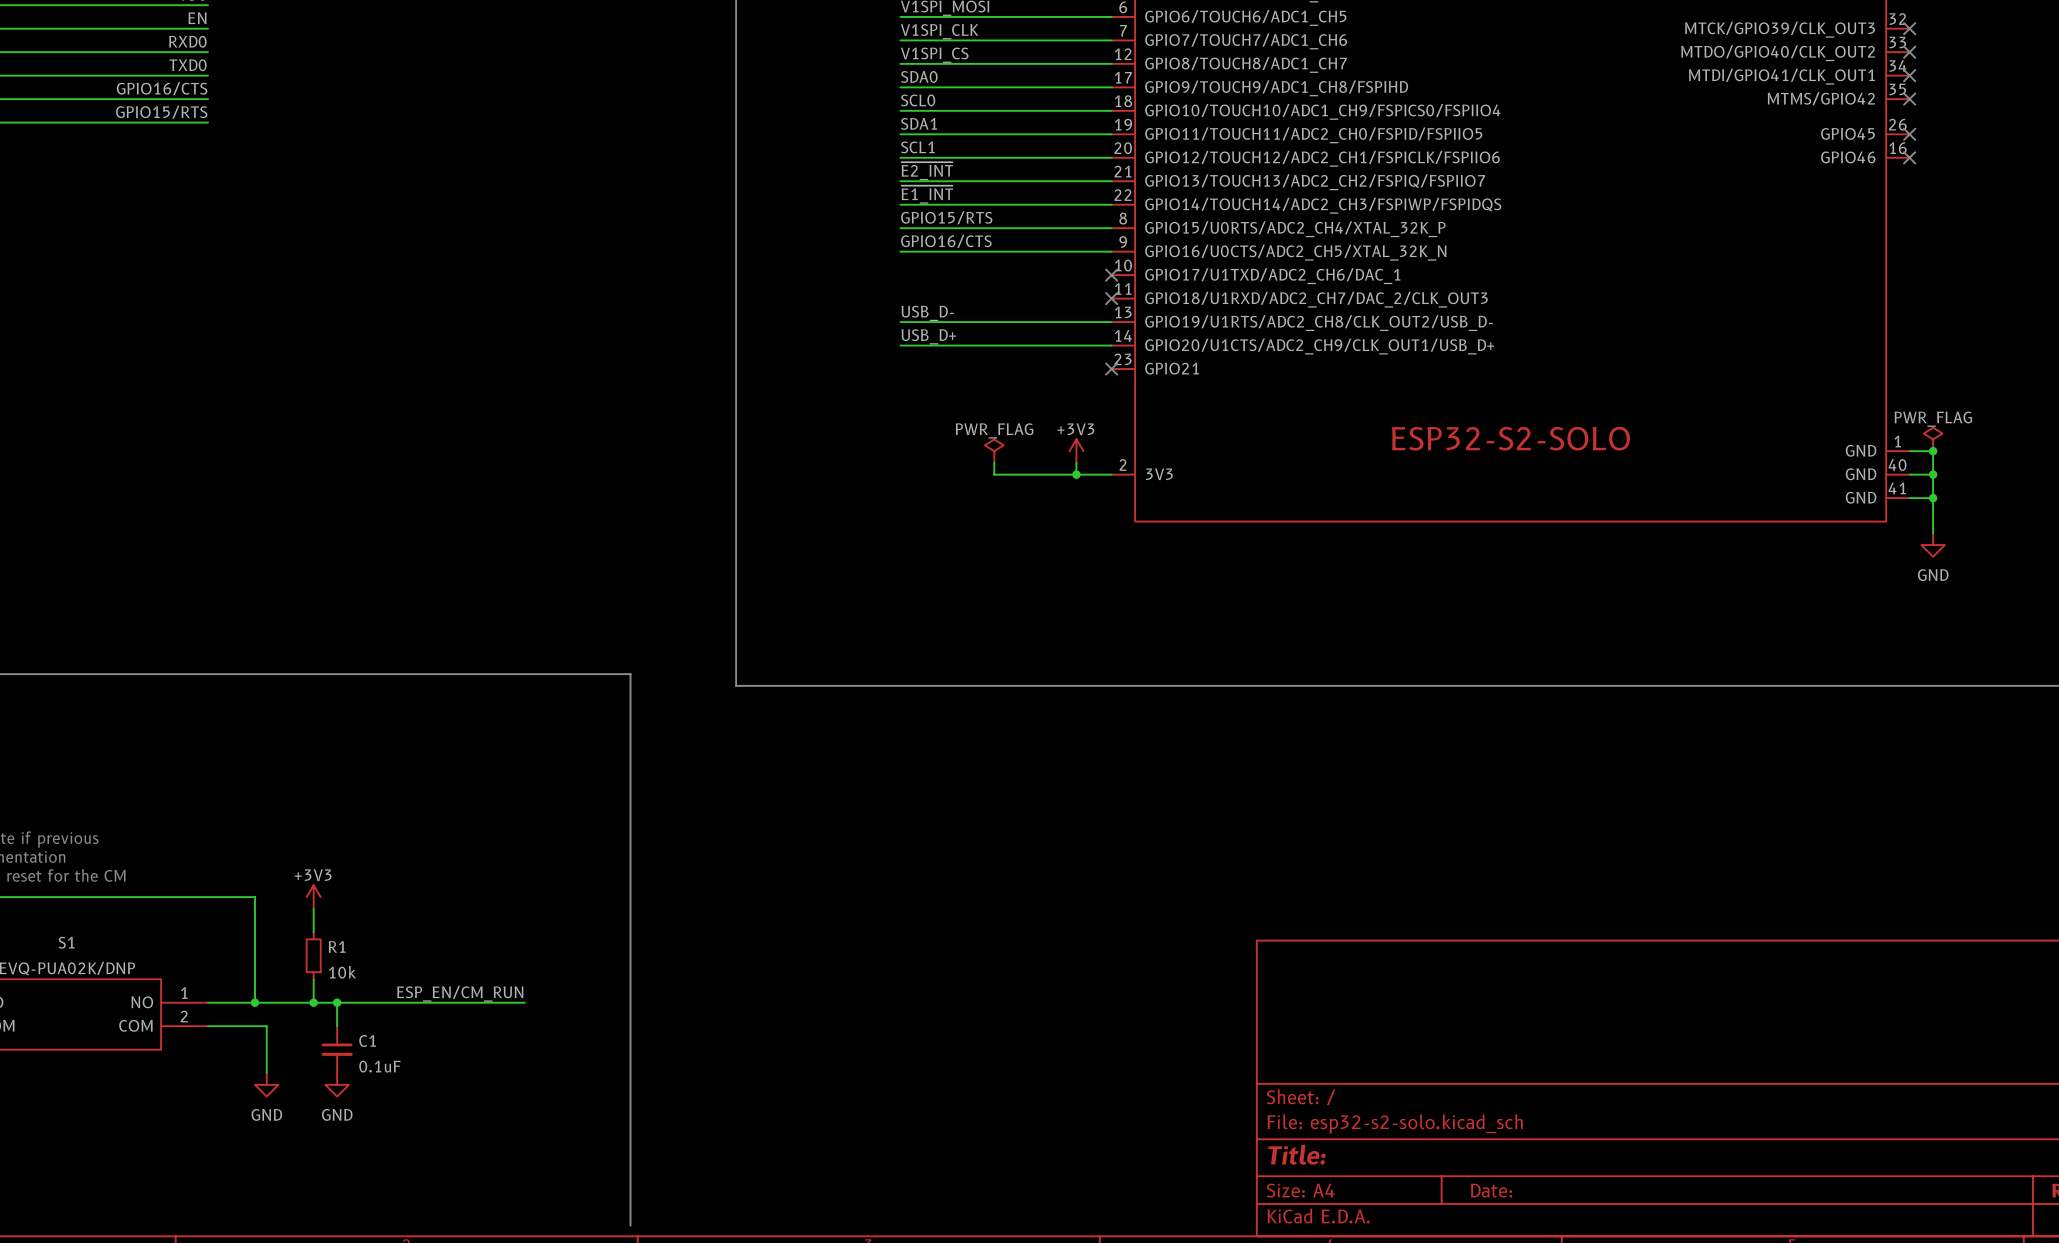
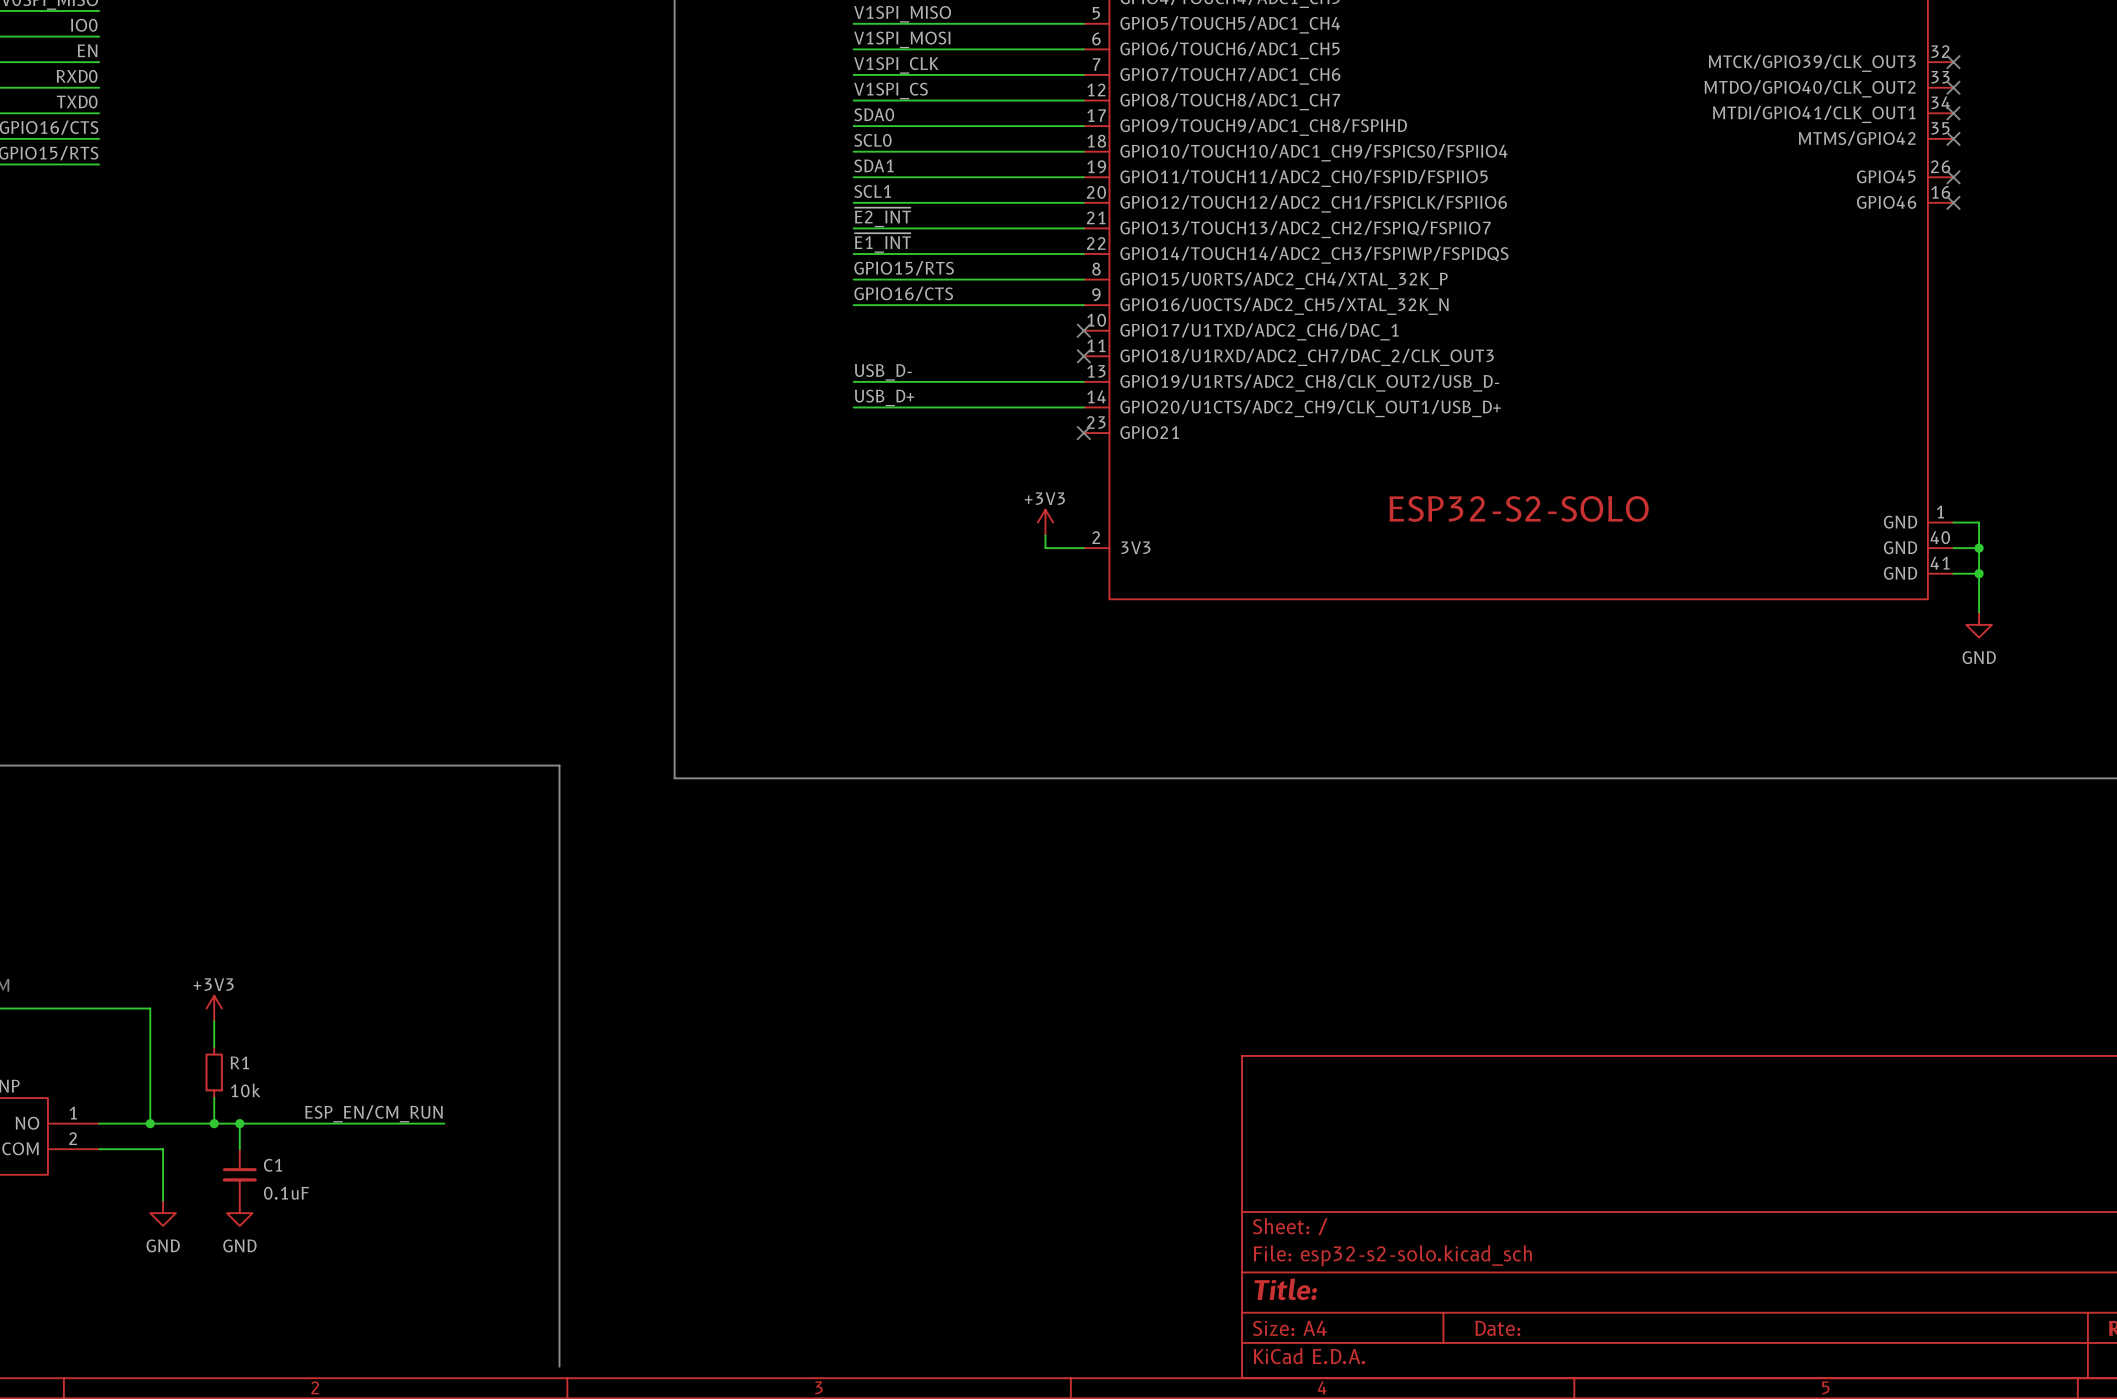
power symbol: PWR_FLAG (1933, 439) -> none
power symbol: PWR_FLAG (994, 451) -> none
junction: (1933, 451) -> none
wire: (994, 462) (994, 474) (1076, 474) -> none
junction: (1076, 474) -> none

